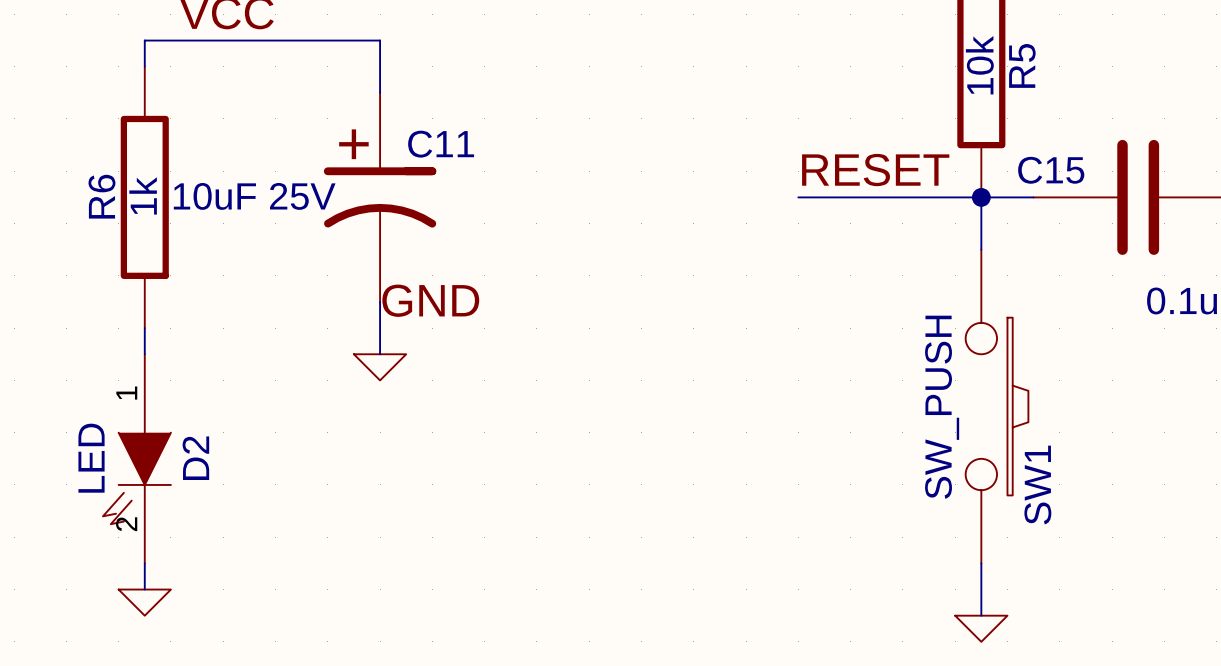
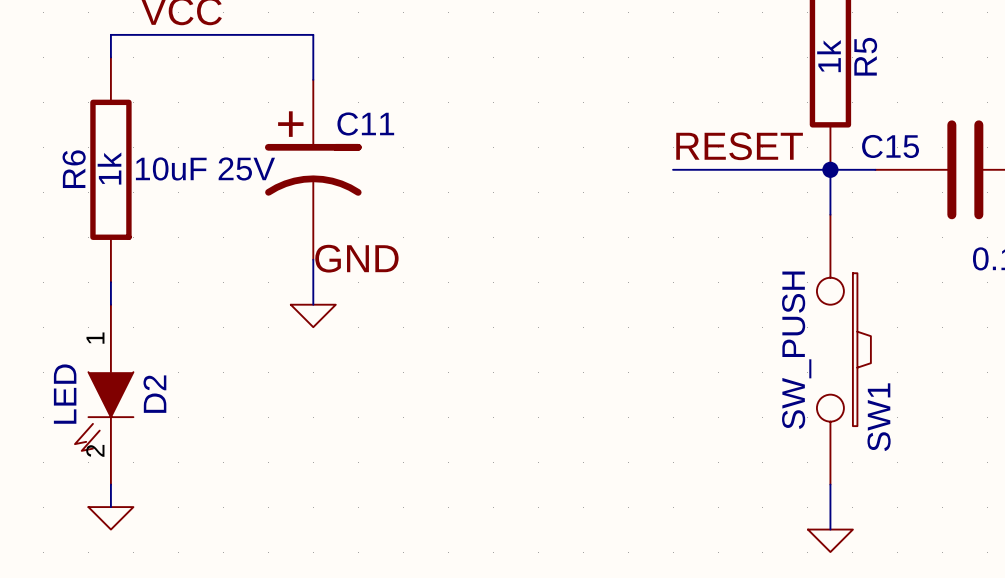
R5 value: 10k (979, 65) -> 1k (828, 56)

